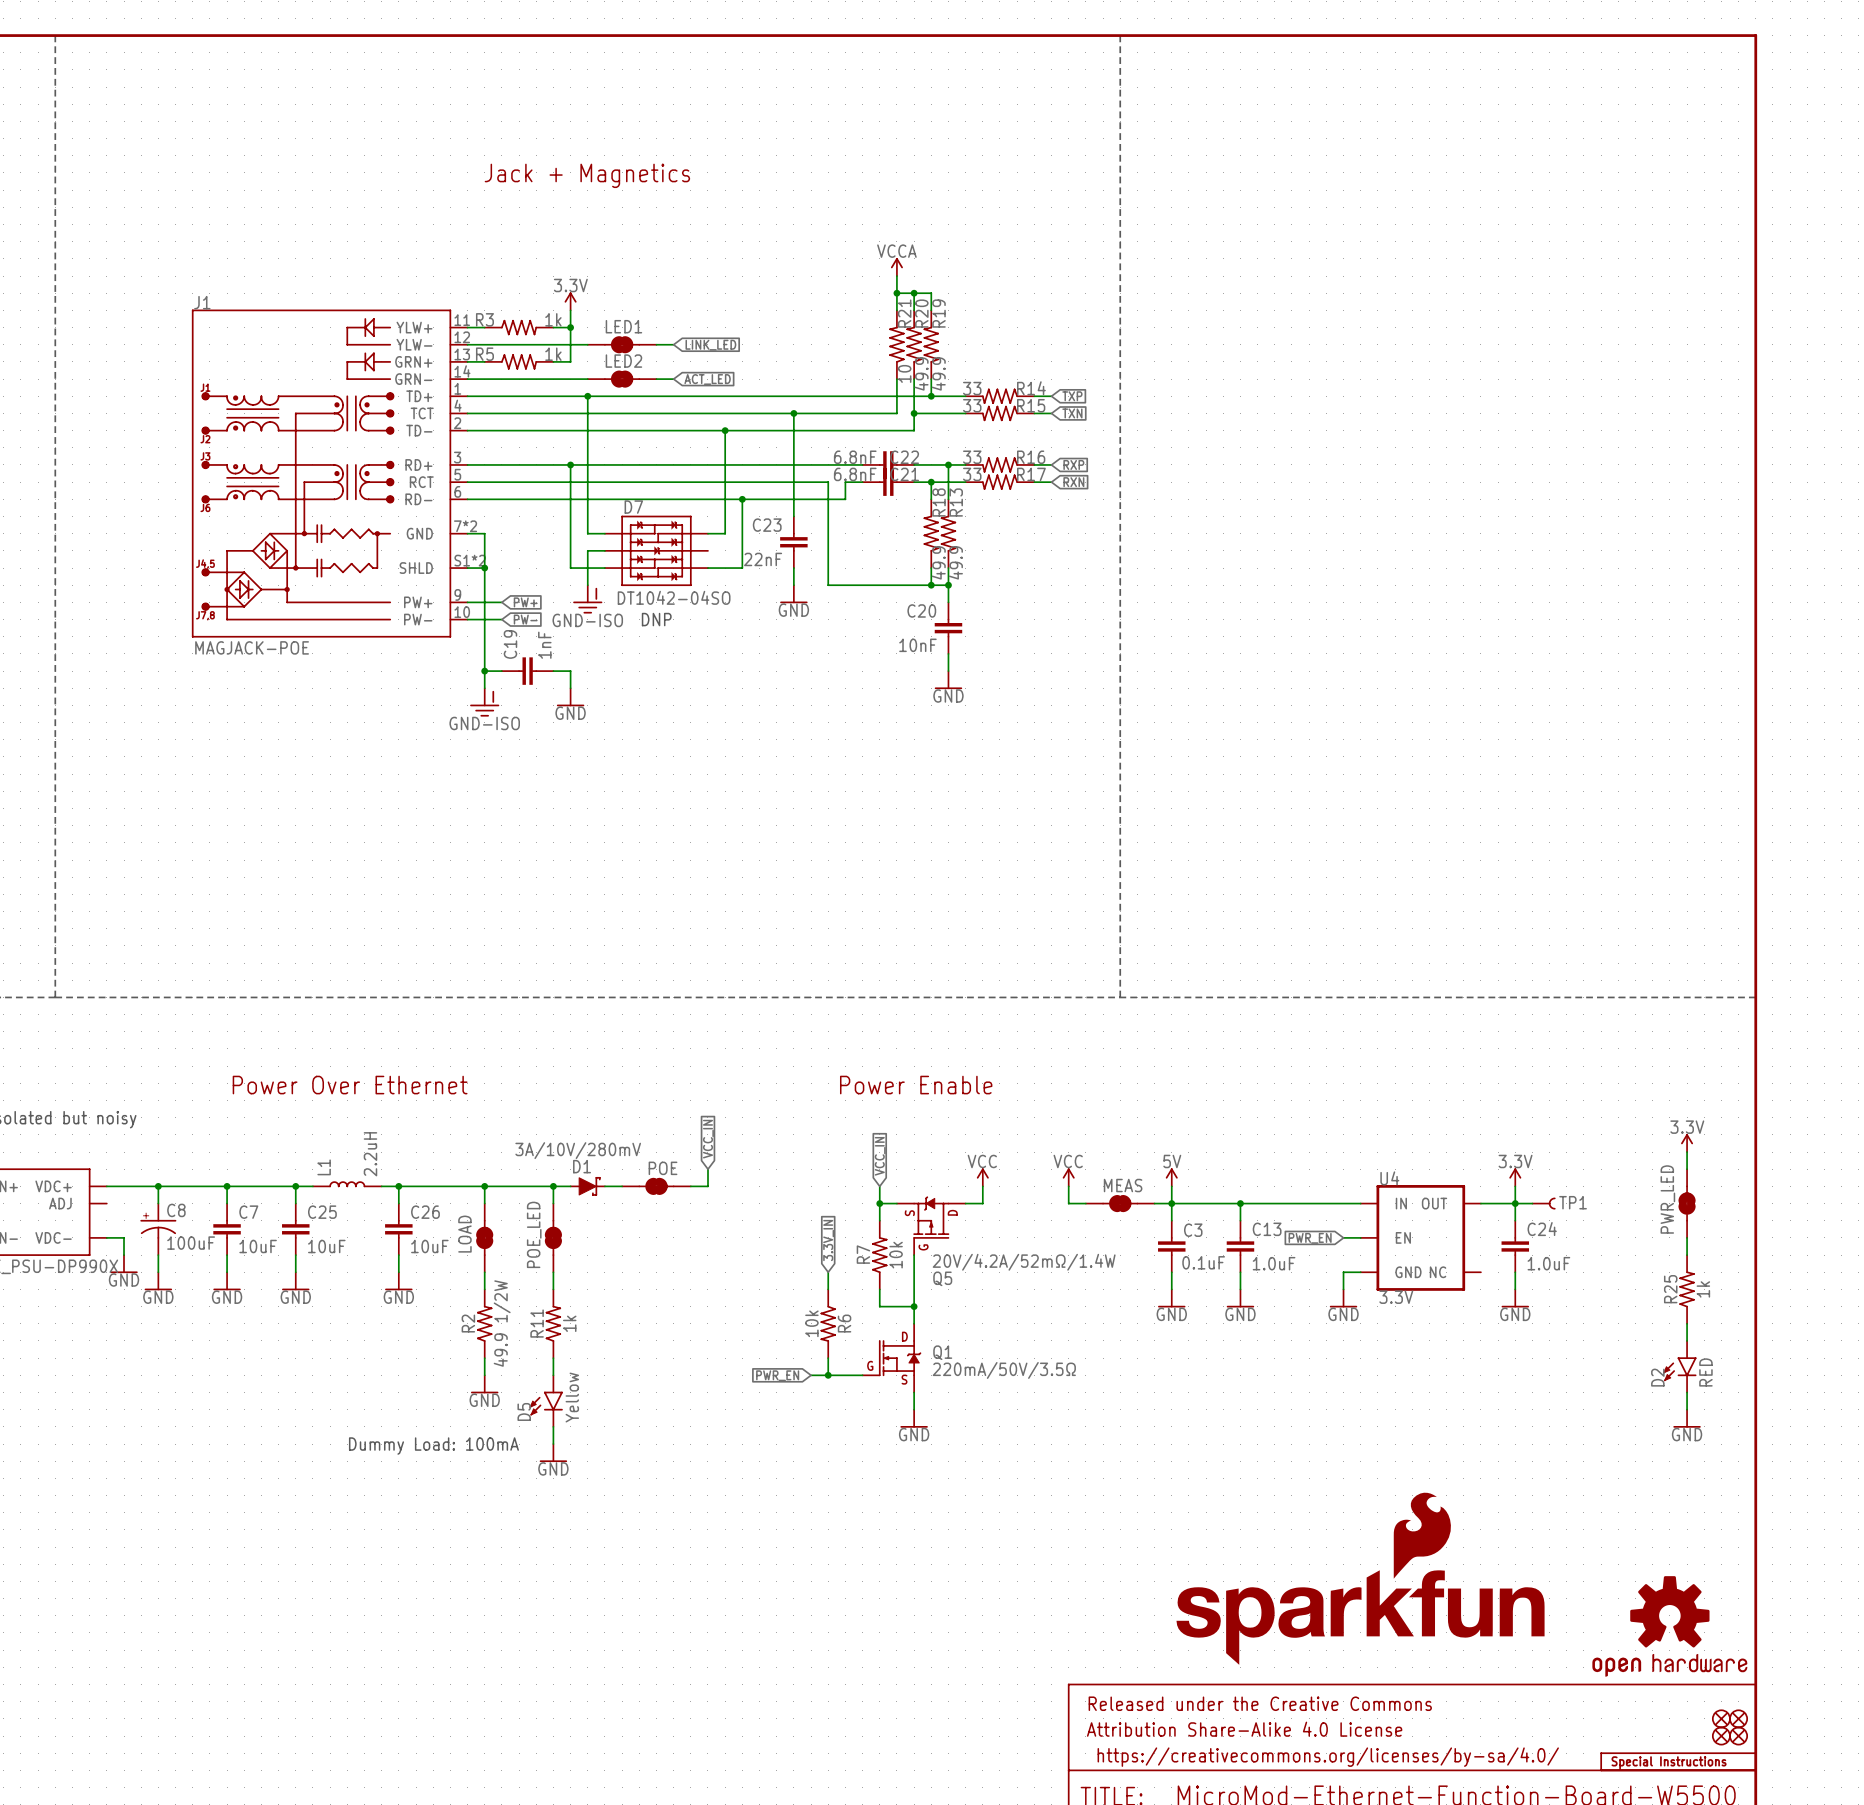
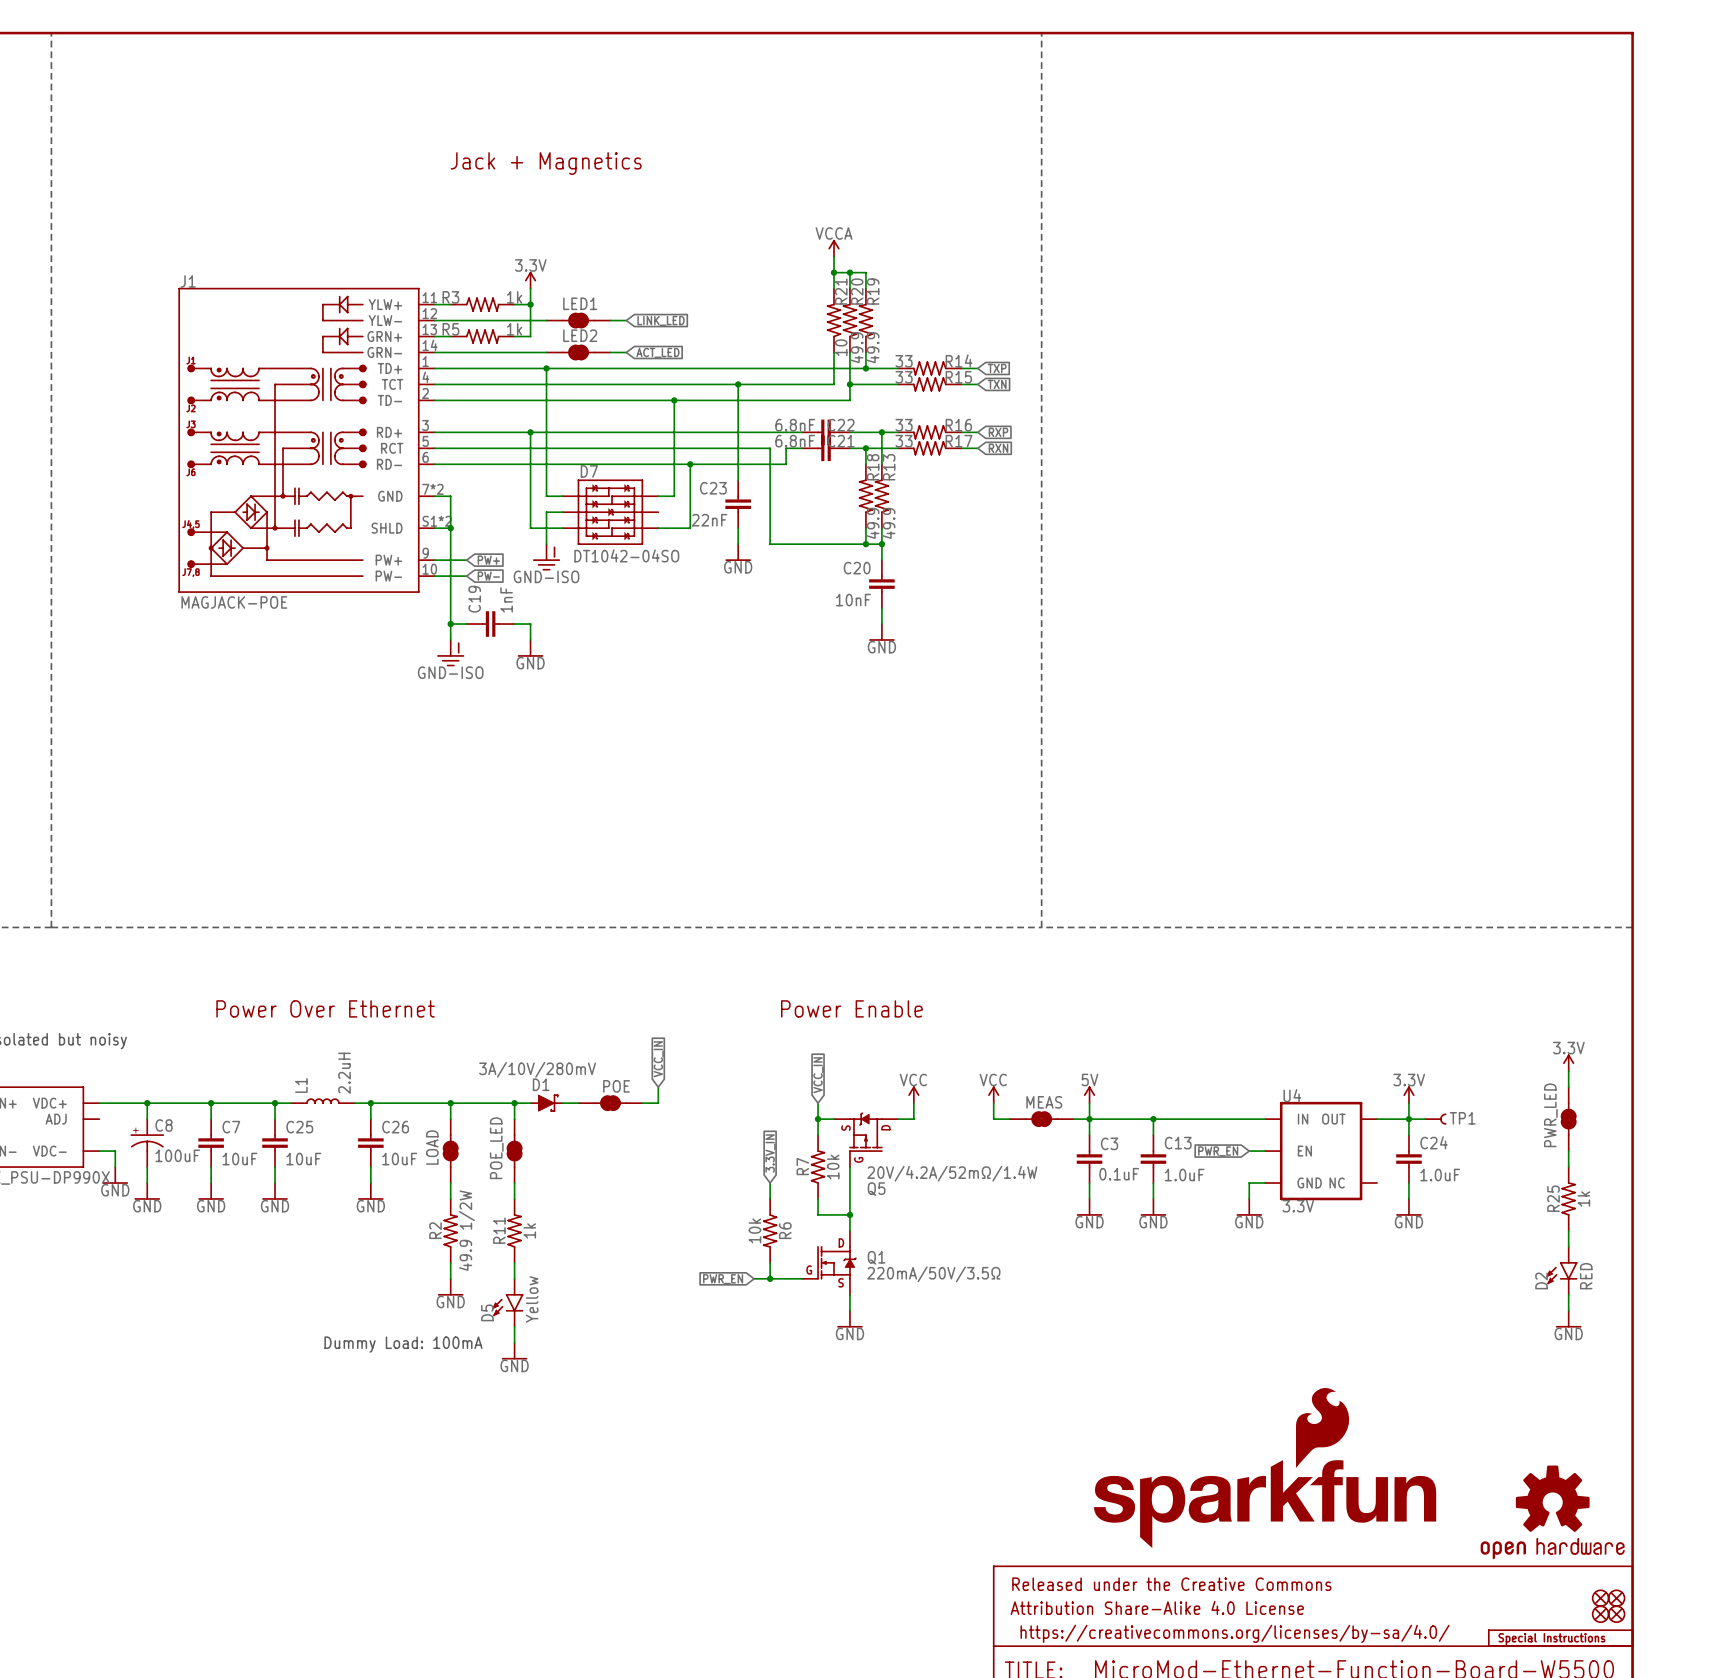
text: DNP (656, 619) -> none

